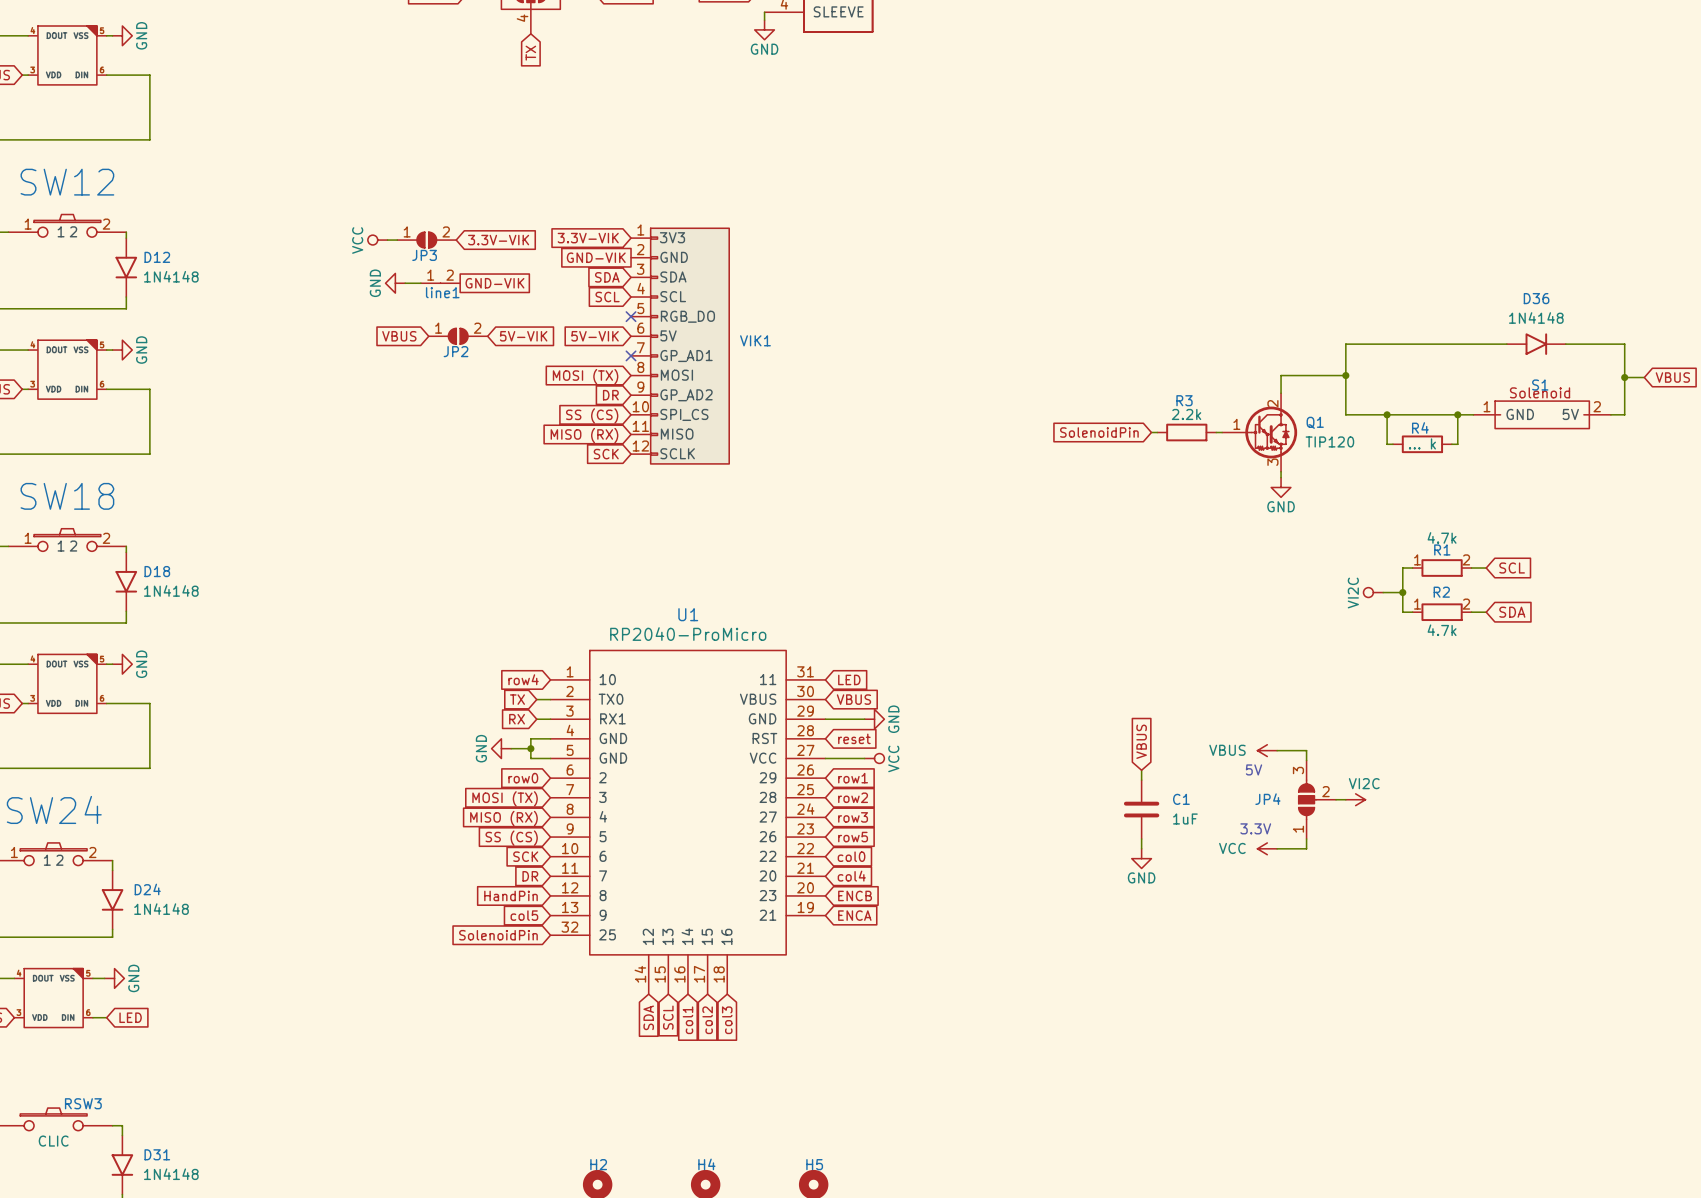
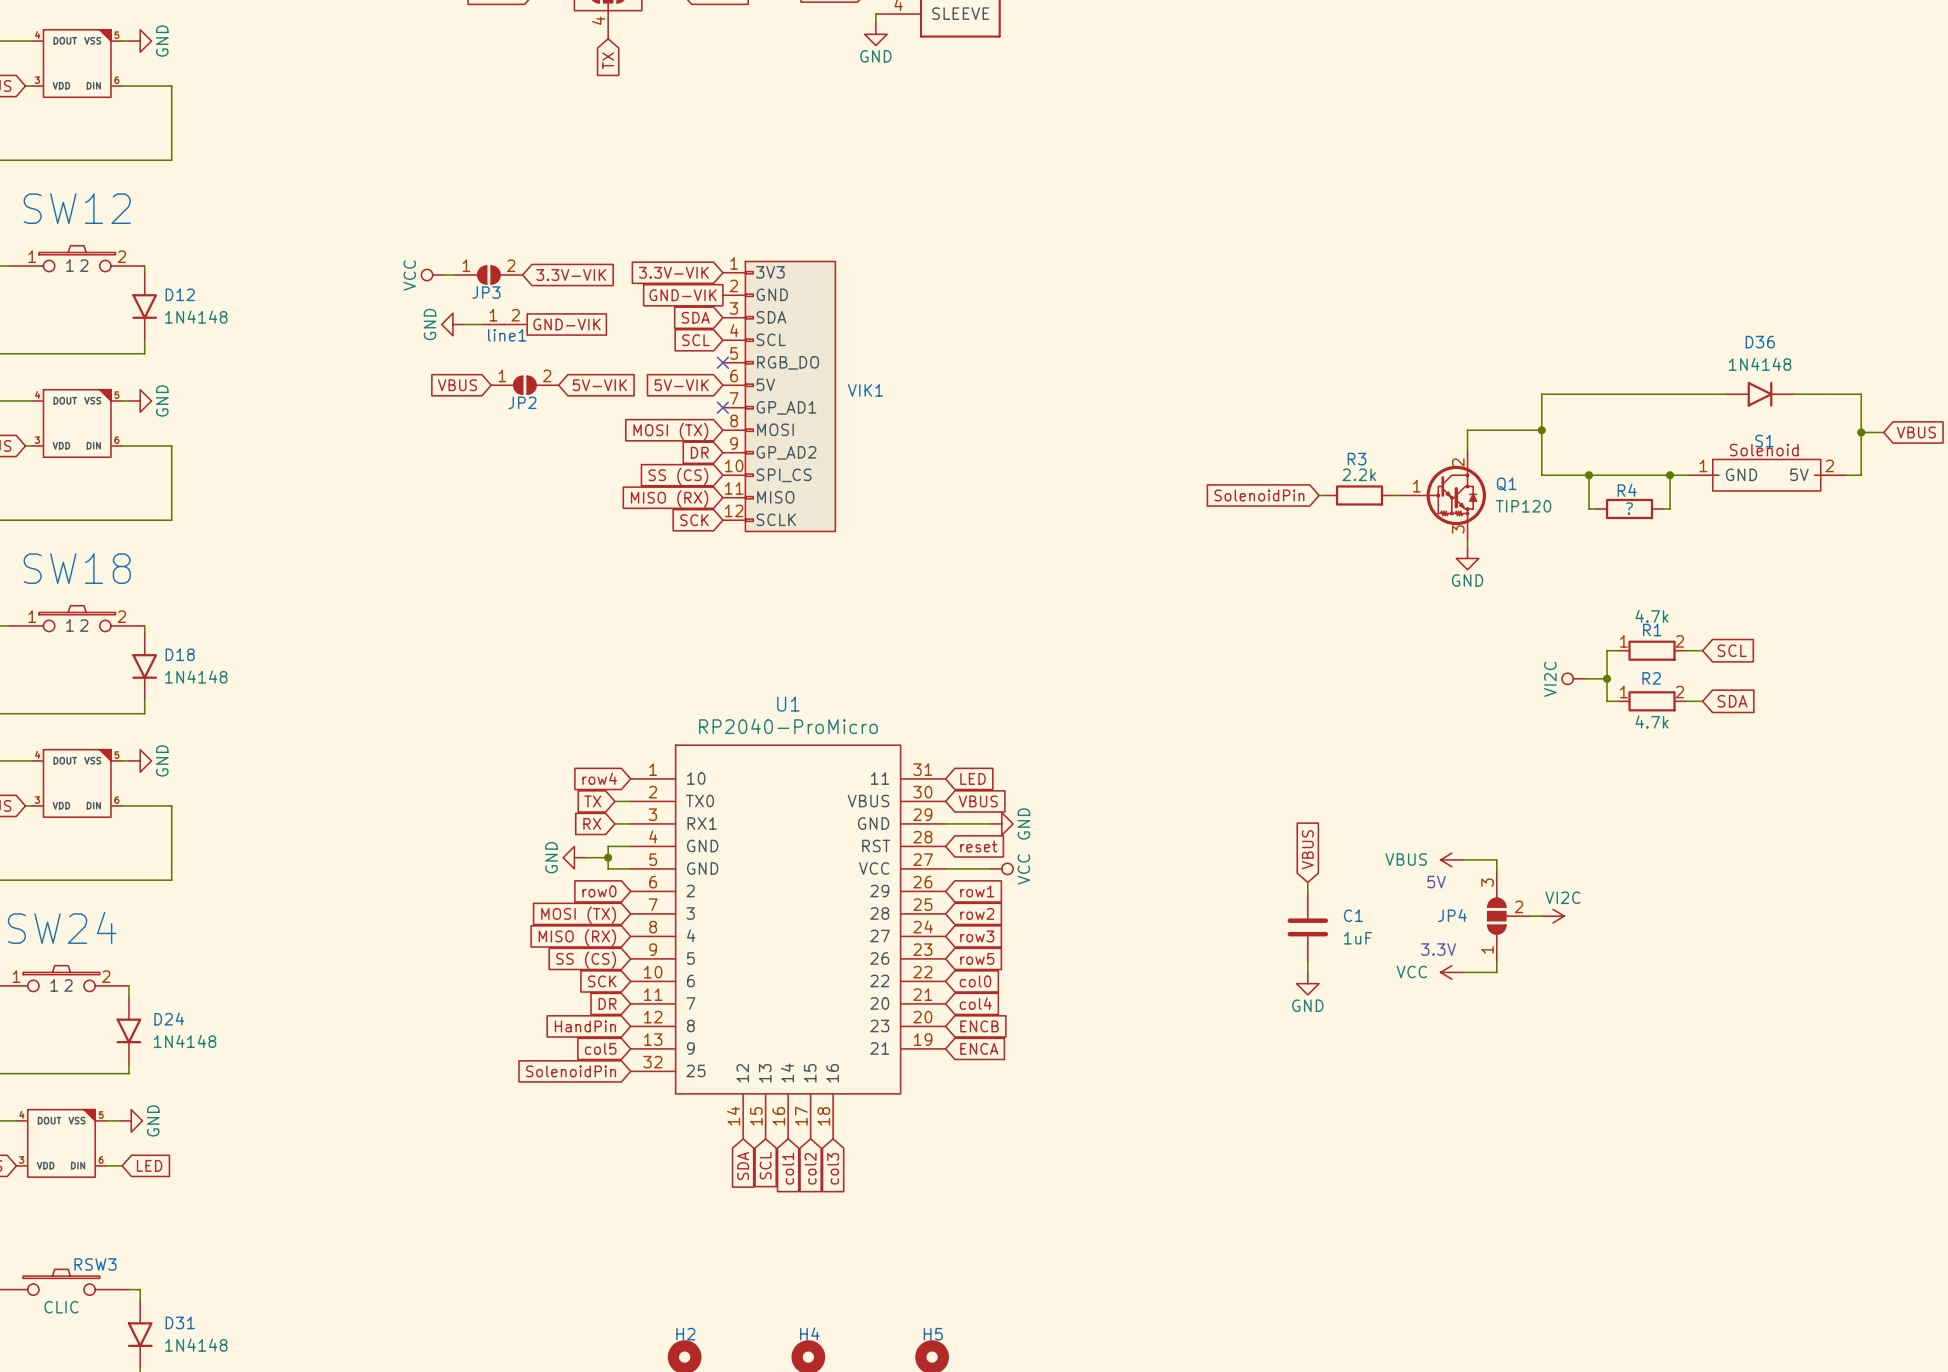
R4 value: ... k (1422, 443) -> ? (1629, 508)

